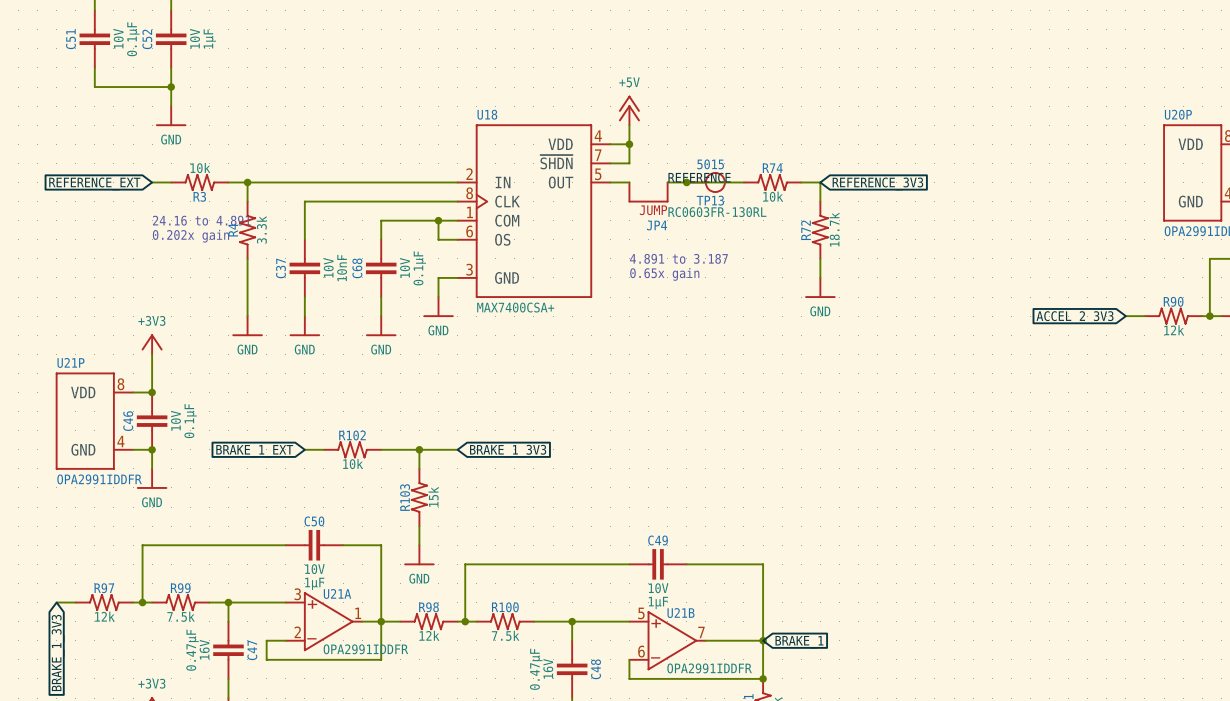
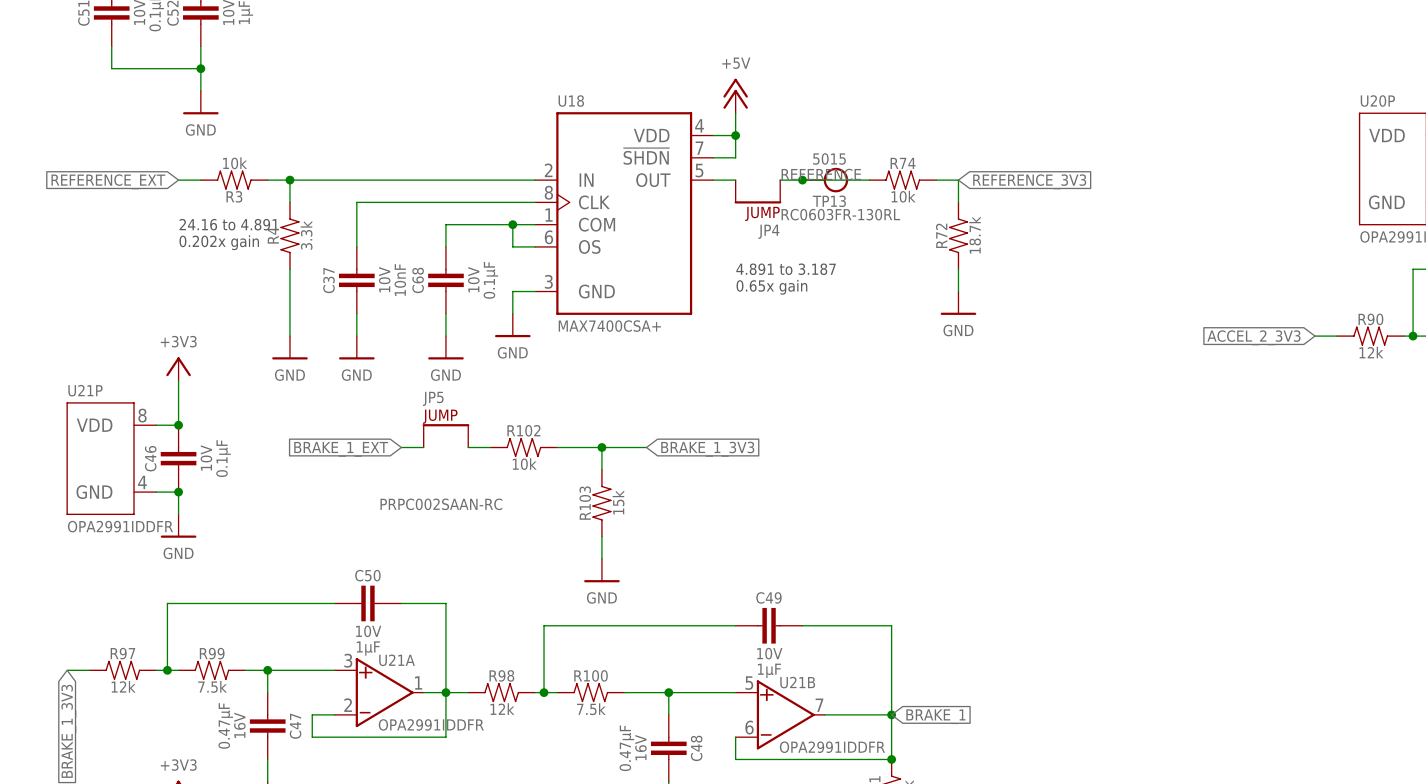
JP5: none -> (445, 435)
wire: none -> (401, 447) (423, 447)
junction: none -> (601, 447)
wire: (304, 449) (323, 449) -> (468, 447) (490, 447)
R102 position: (352, 449) -> (523, 447)
wire: (381, 449) (457, 449) -> (557, 447) (646, 447)
wire: (419, 449) (419, 468) -> (601, 447) (601, 469)
junction: (419, 449) -> none
global label position: BRAKE_1_EXT (254, 451) -> BRAKE_1_EXT (341, 449)
global label position: BRAKE_1_3V3 (508, 451) -> BRAKE_1_3V3 (707, 449)
R103 position: (419, 497) -> (601, 503)
wire: (419, 526) (419, 545) -> (601, 536) (601, 558)
power symbol position: GND (419, 555) -> GND (601, 570)

